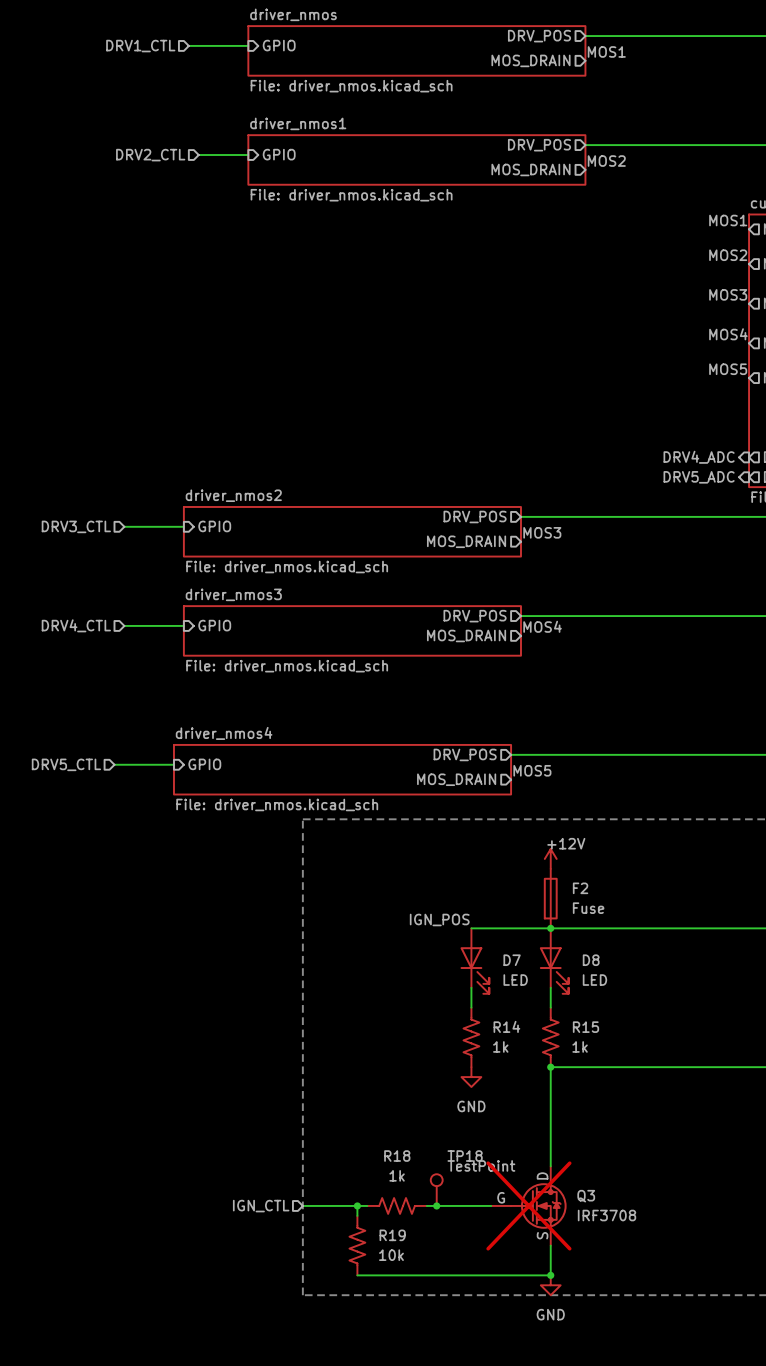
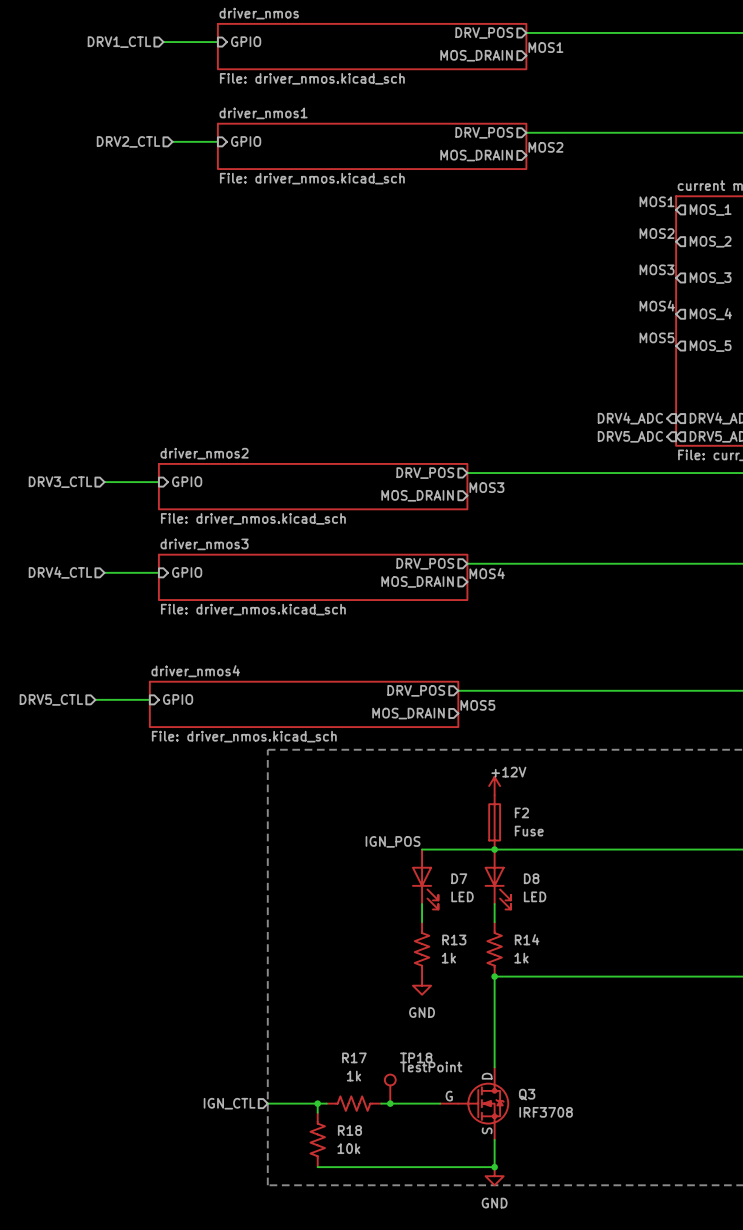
R14 name: R14 (506, 1026) -> R13 (454, 939)
R15 name: R15 (585, 1027) -> R14 (527, 939)
R18 name: R18 (397, 1156) -> R17 (354, 1057)
Q3 do-not-place cross: (528, 1205) -> none
R19 name: R19 (392, 1235) -> R18 (349, 1130)

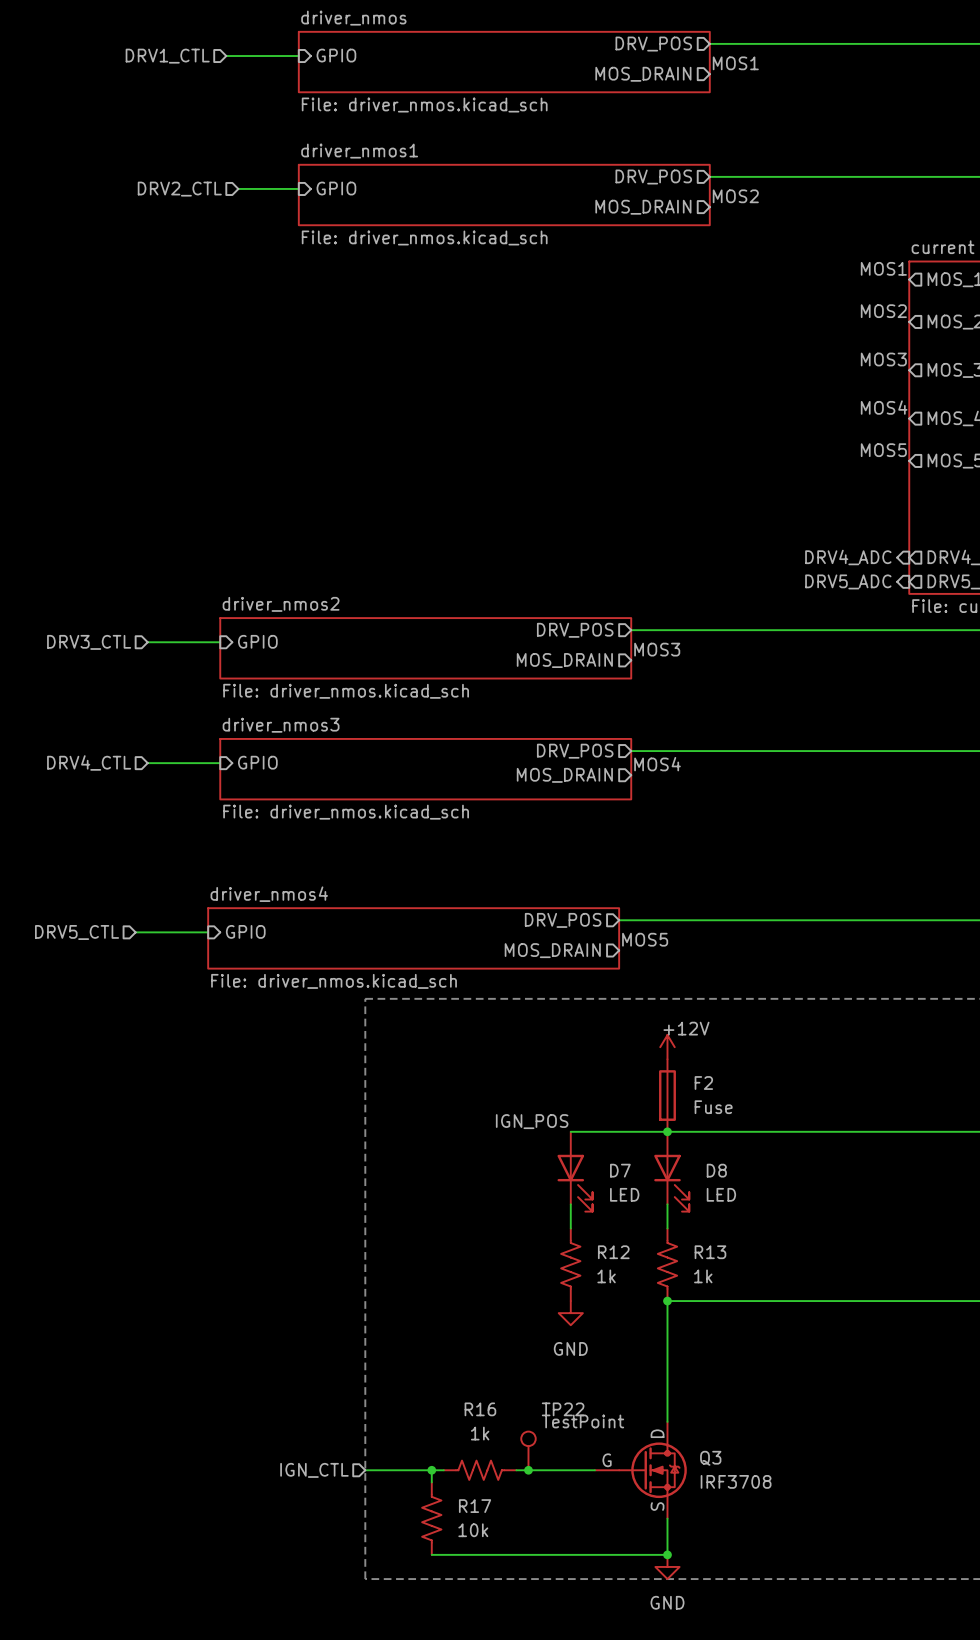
R13 name: R13 (454, 939) -> R12 (613, 1252)
R14 name: R14 (527, 939) -> R13 (710, 1252)
R17 name: R17 (354, 1057) -> R16 (480, 1409)
TP18 name: TP18 (416, 1057) -> TP22 (563, 1409)
R18 name: R18 (349, 1130) -> R17 (475, 1506)

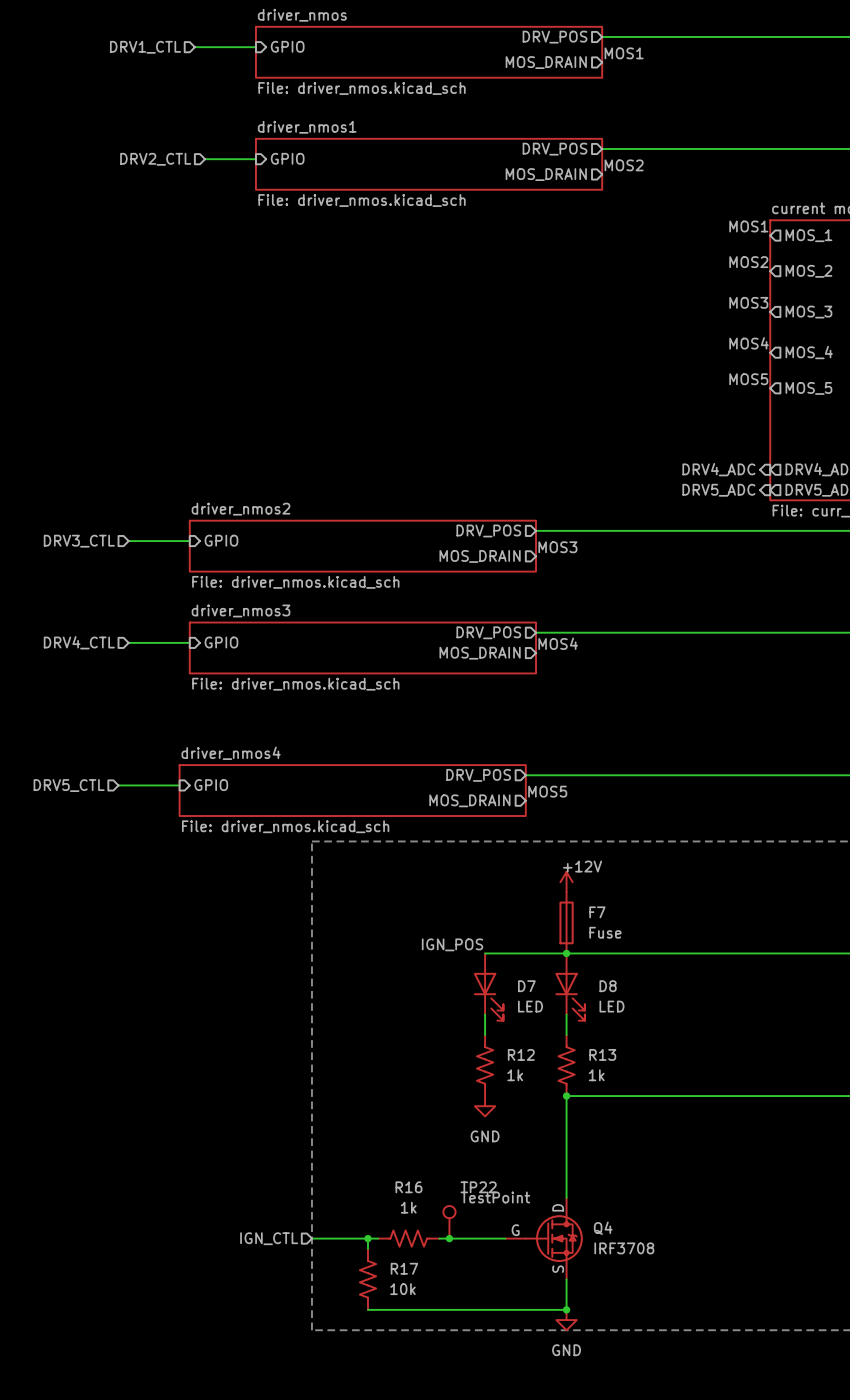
F2 name: F2 (703, 1083) -> F7 (597, 912)
Q3 name: Q3 (710, 1458) -> Q4 (603, 1228)

